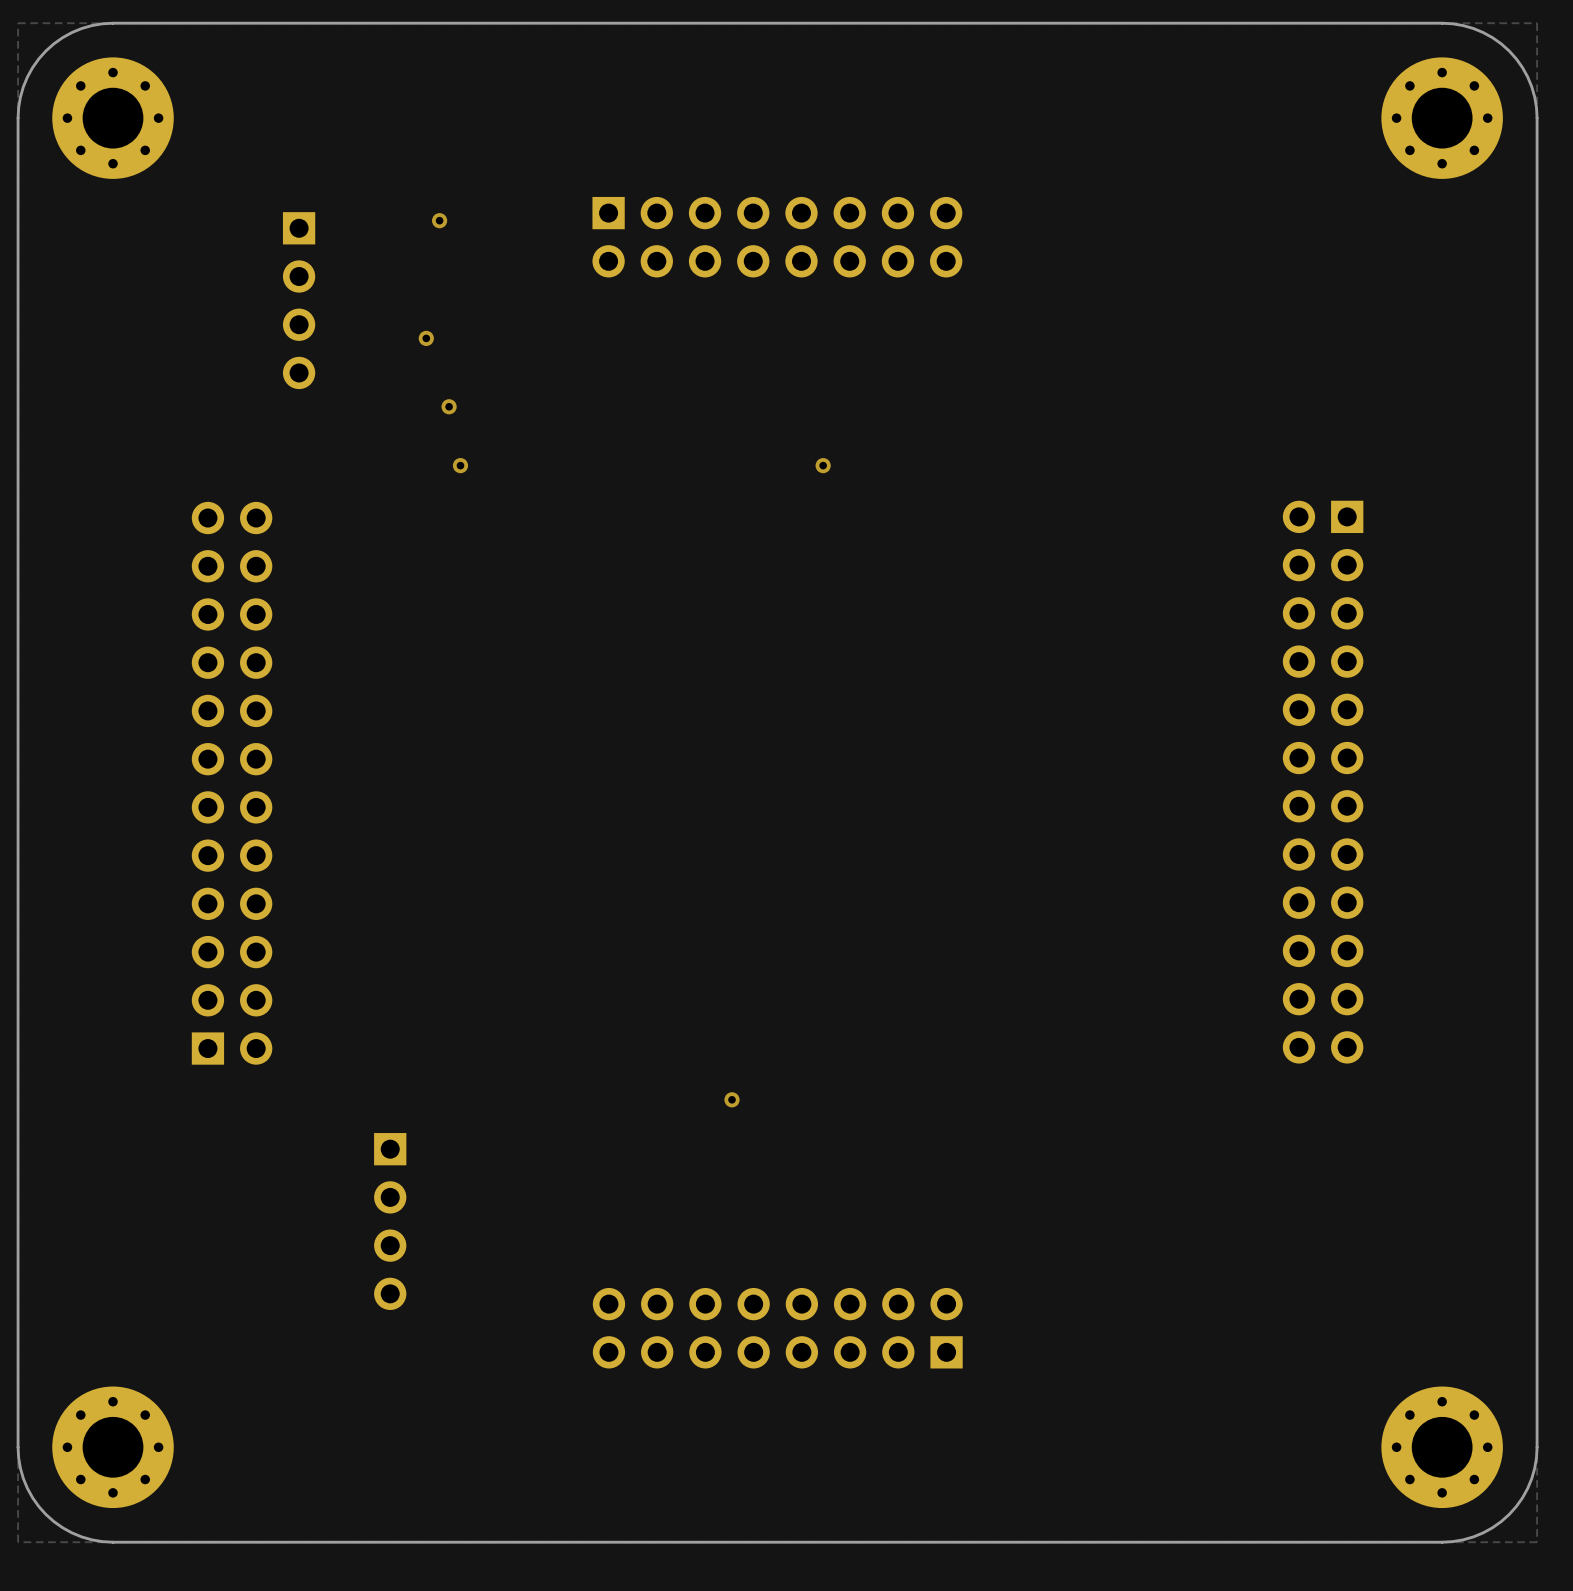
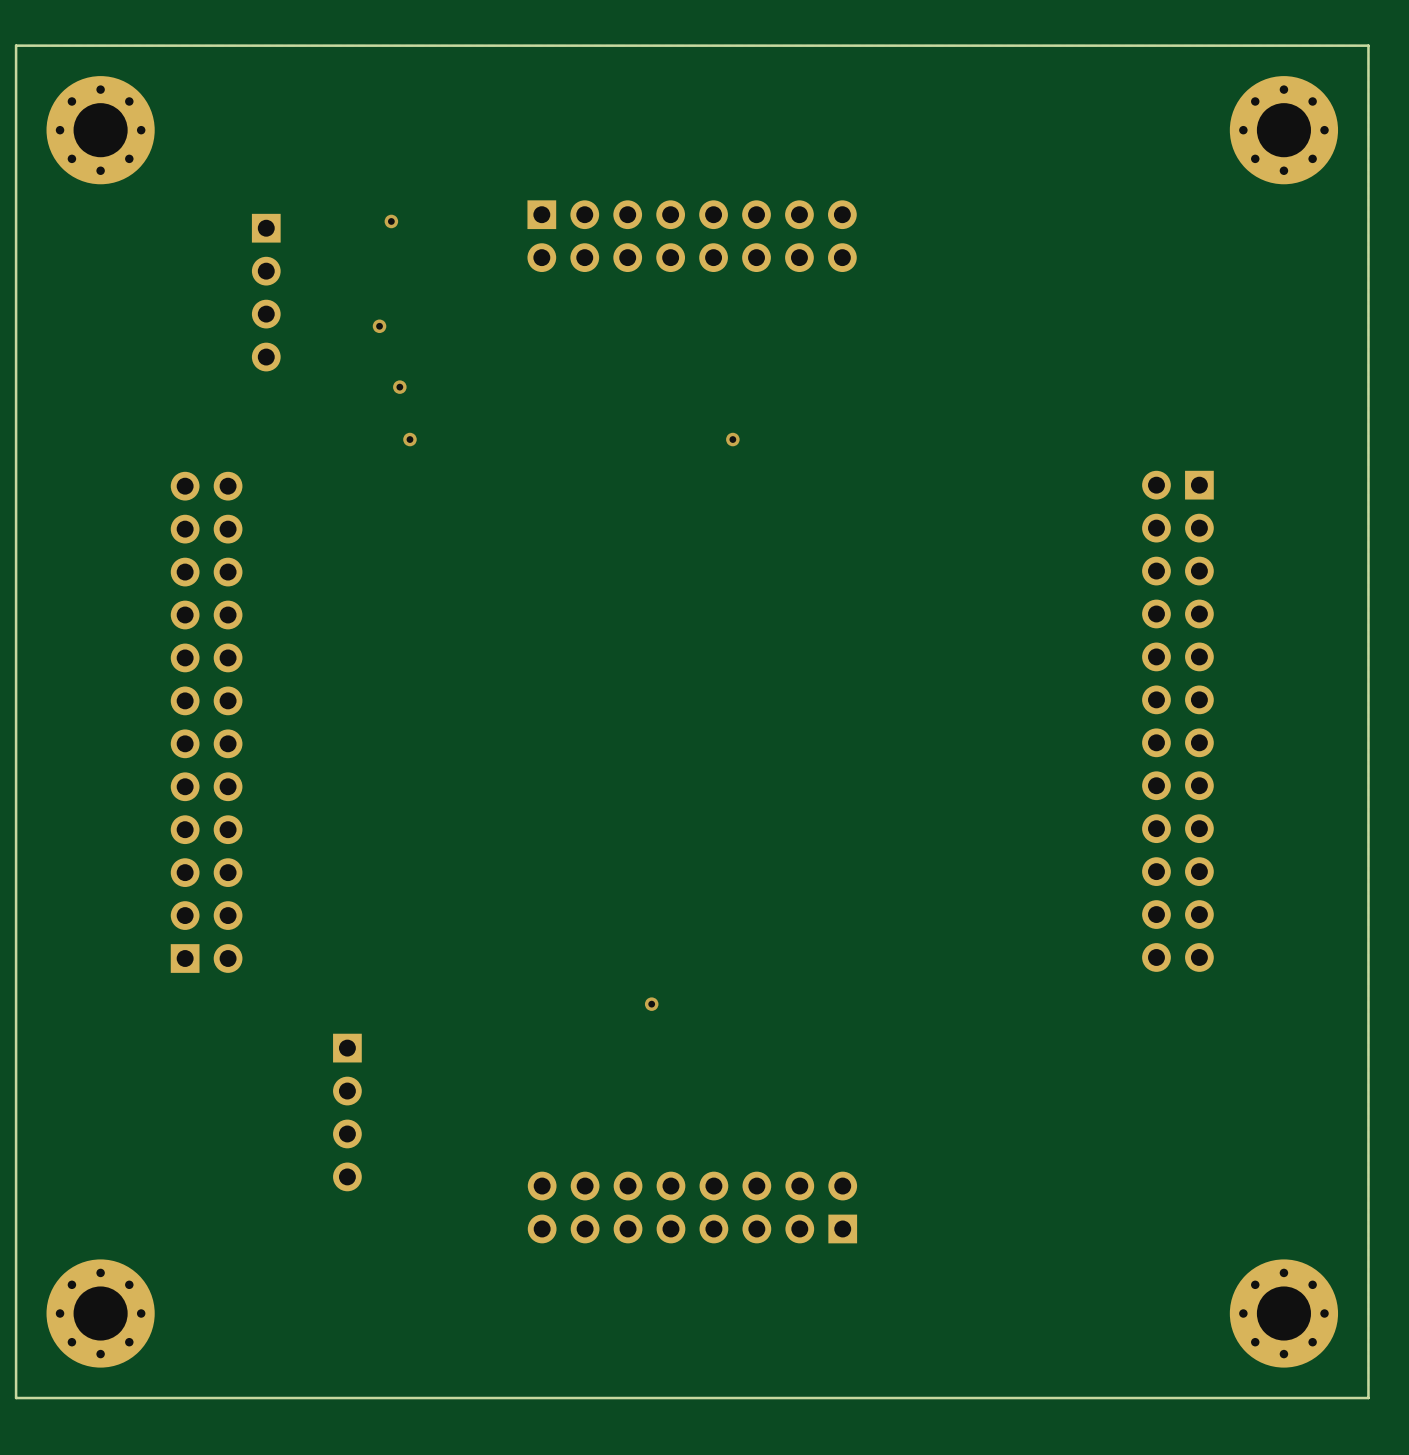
board edge: (113, 23) (81, 28) (62, 37) (45, 51) (32, 67) (23, 86) (18, 118) -> (100, 45) (16, 45) (16, 130)
board edge: (1442, 23) (1463, 25) (1483, 32) (1509, 51) (1527, 76) (1534, 97) (1537, 118) -> (1283, 45) (1368, 45) (1368, 130)
board edge: (18, 1447) (23, 1478) (32, 1497) (45, 1514) (62, 1527) (81, 1536) (113, 1542) -> (16, 1313) (16, 1398) (100, 1398)
board edge: (1537, 1447) (1531, 1478) (1522, 1497) (1509, 1514) (1492, 1527) (1473, 1536) (1442, 1542) -> (1368, 1313) (1368, 1398) (1283, 1398)

